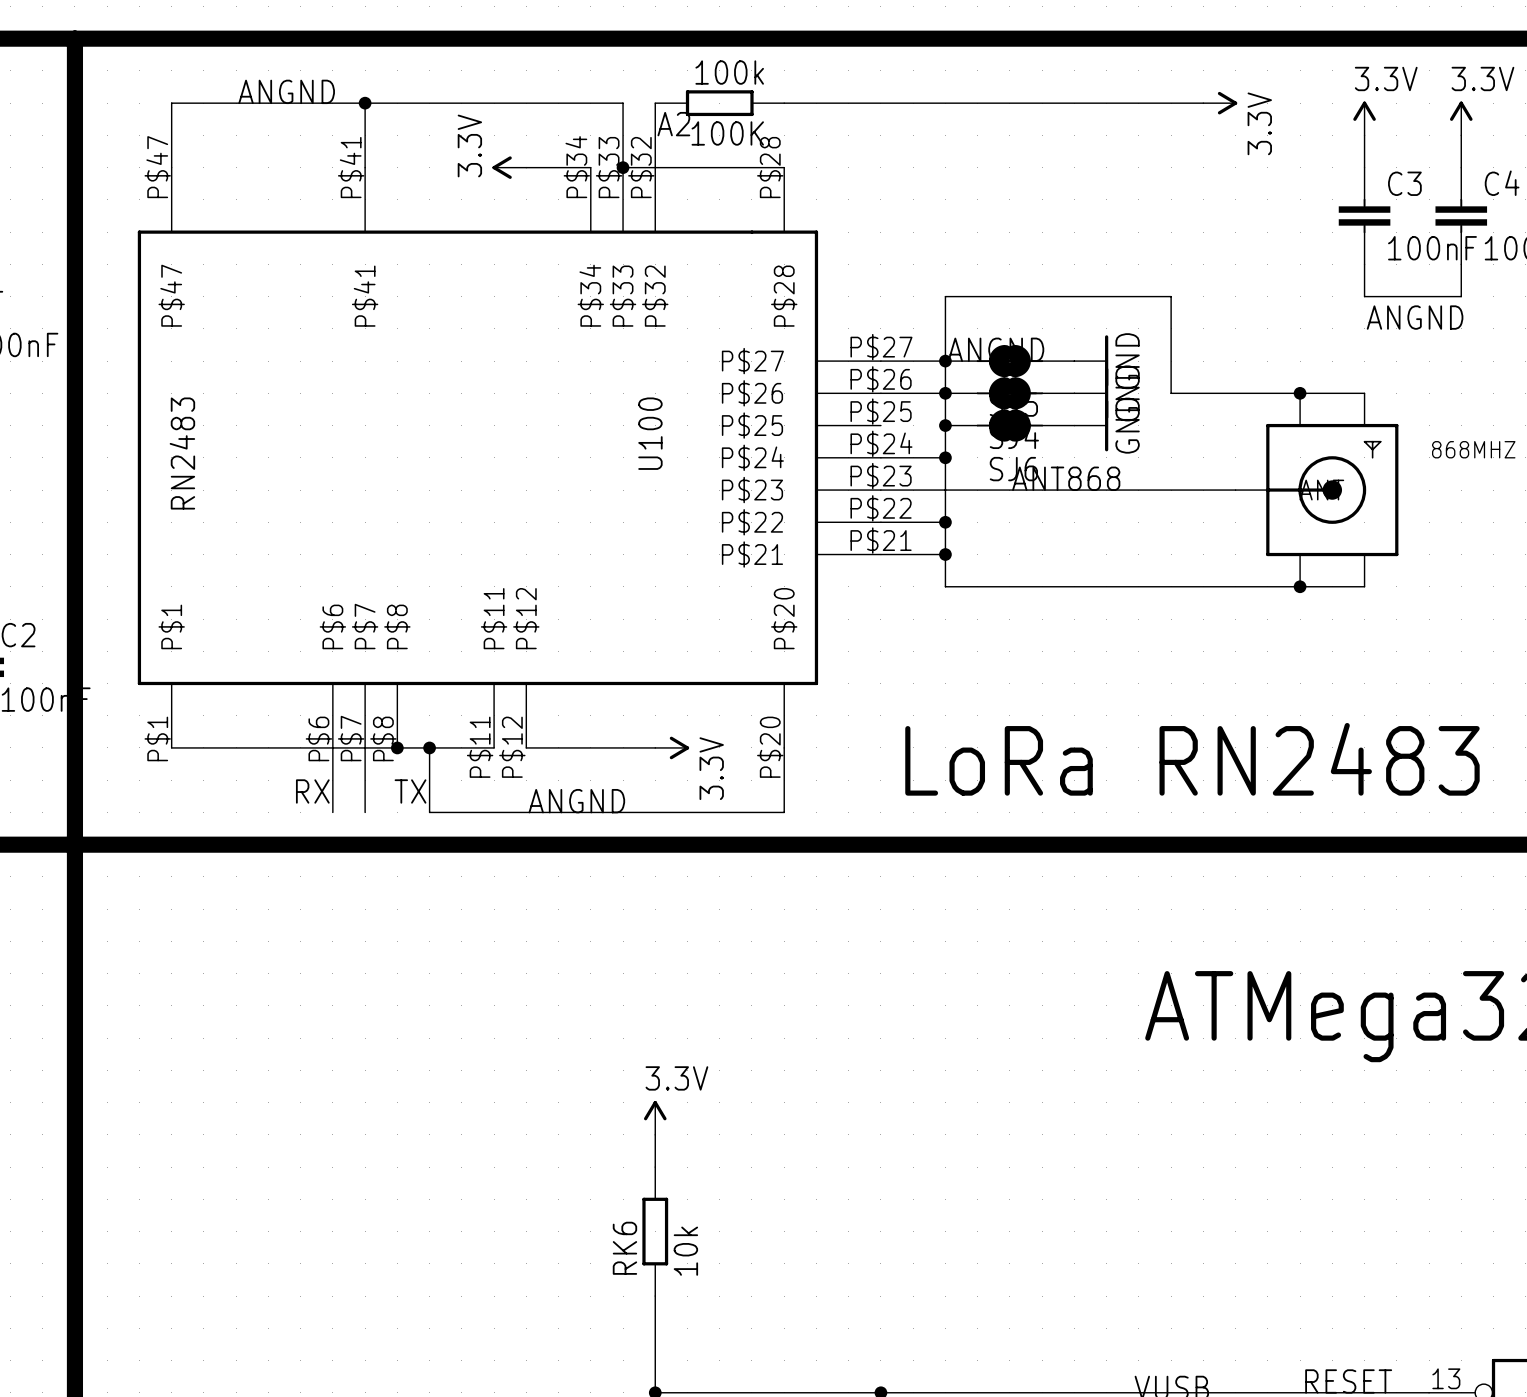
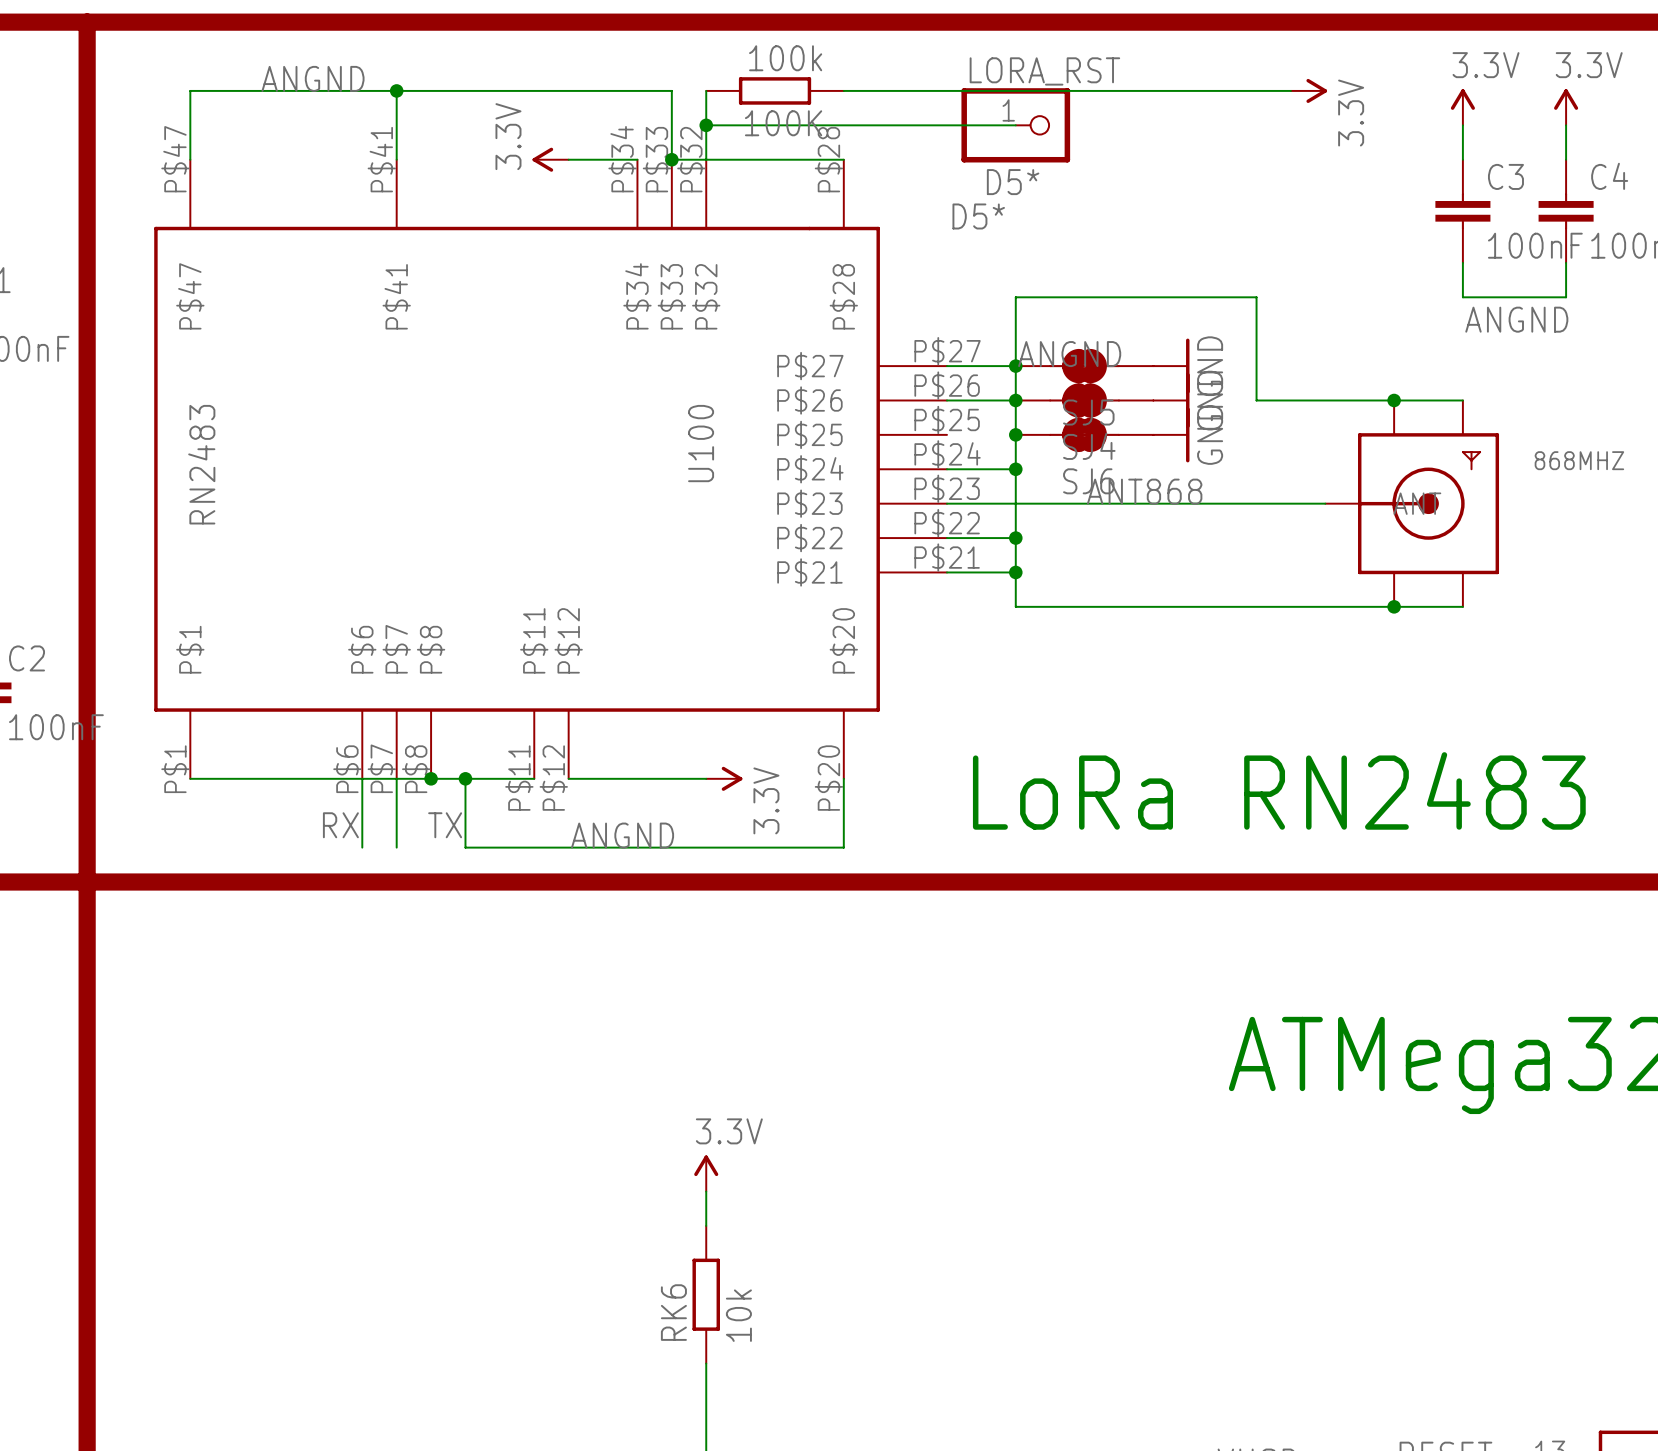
label: A2 (673, 124) -> none
wire: none -> (706, 125) (1015, 125)
junction: none -> (706, 125)
LORA_RST: none -> (1015, 125)
label: none -> D5* (1013, 182)
label: none -> D5* (978, 216)

